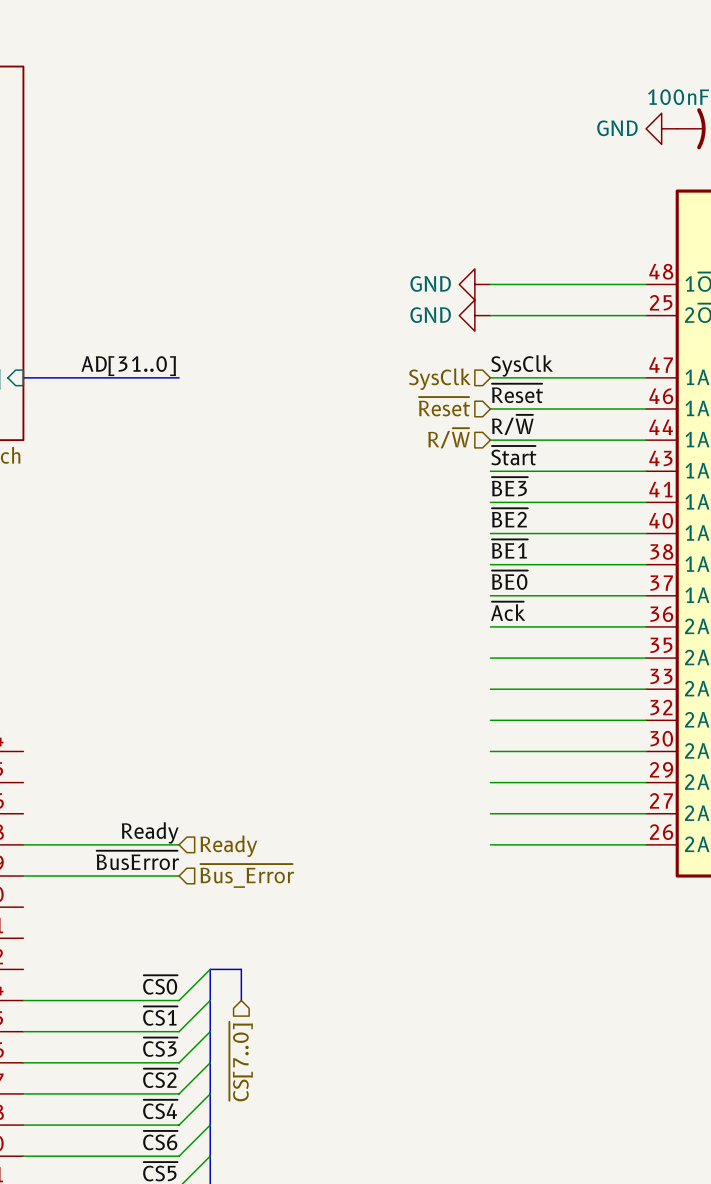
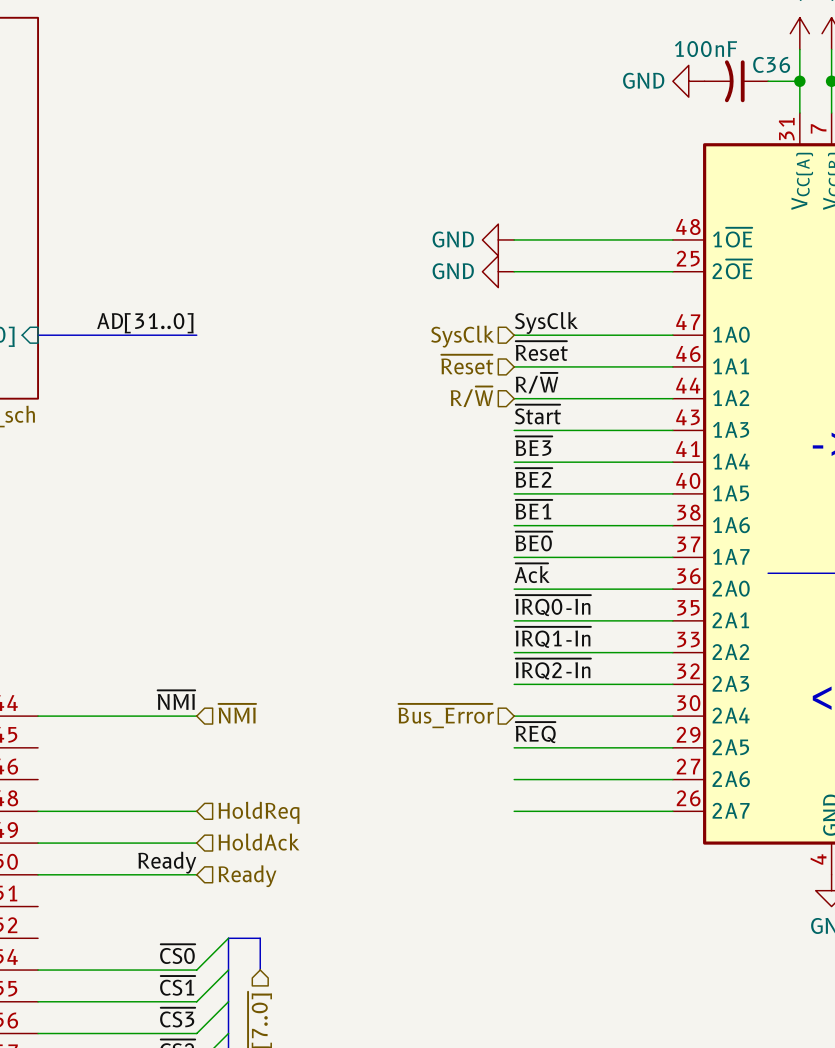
label: none -> ~{IRQ0-In} (553, 605)
label: none -> ~{IRQ1-In} (553, 637)
label: none -> ~{IRQ2-In} (553, 669)
label: none -> ~{NMI} (176, 700)
hierarchical label: none -> ~{NMI} (237, 713)
wire: none -> (38, 716) (196, 716)
hierarchical label: none -> ~{Bus_Error} (446, 716)
label: none -> ~{REQ} (535, 732)
label position: Ready (150, 832) -> Ready (167, 862)
hierarchical label: Ready (228, 846) -> HoldReq (258, 812)
label: ~{BusError} (137, 860) -> none
hierarchical label: ~{Bus_Error} (247, 875) -> HoldAck (258, 842)
wire: none -> (38, 874) (196, 874)
hierarchical label: none -> Ready (247, 876)

